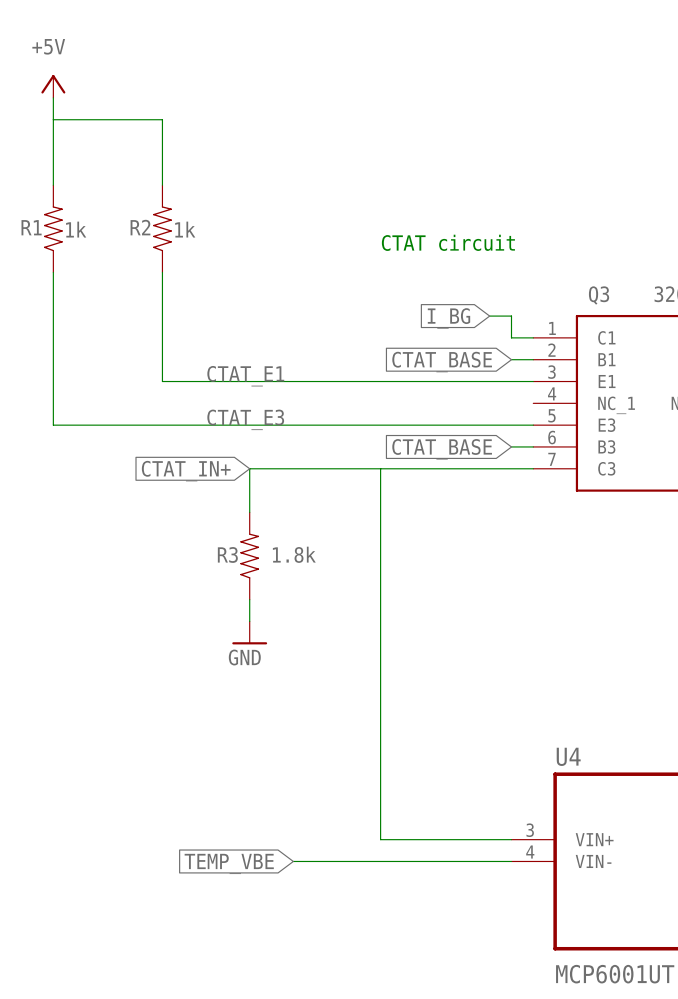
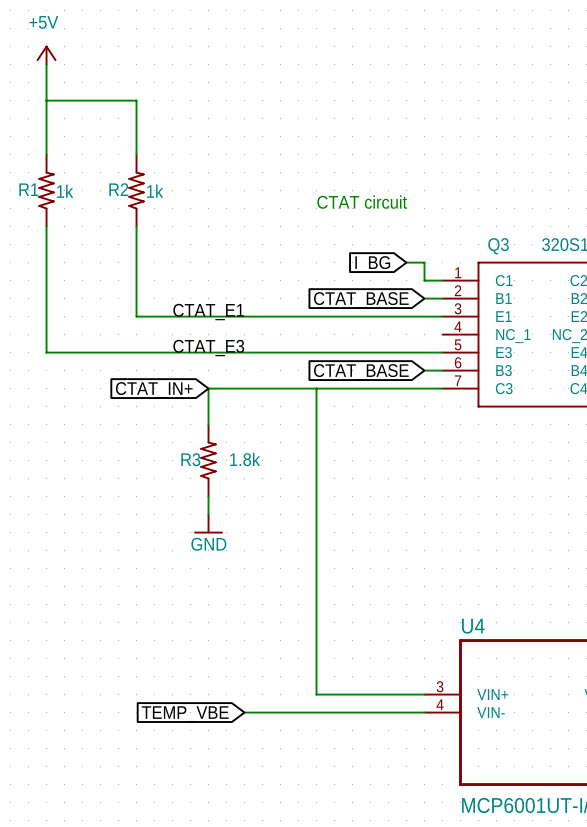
power symbol position: +5V (53, 86) -> +5V (46, 55)

